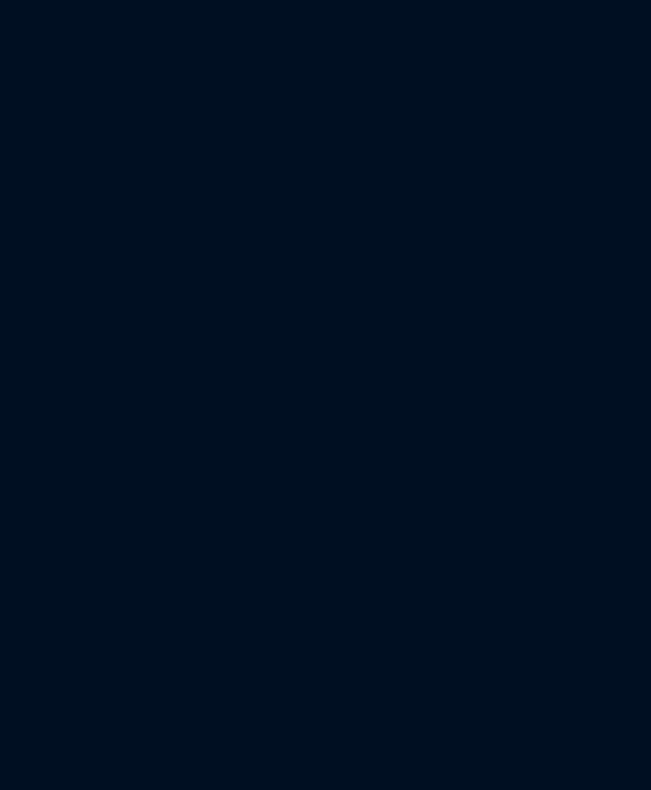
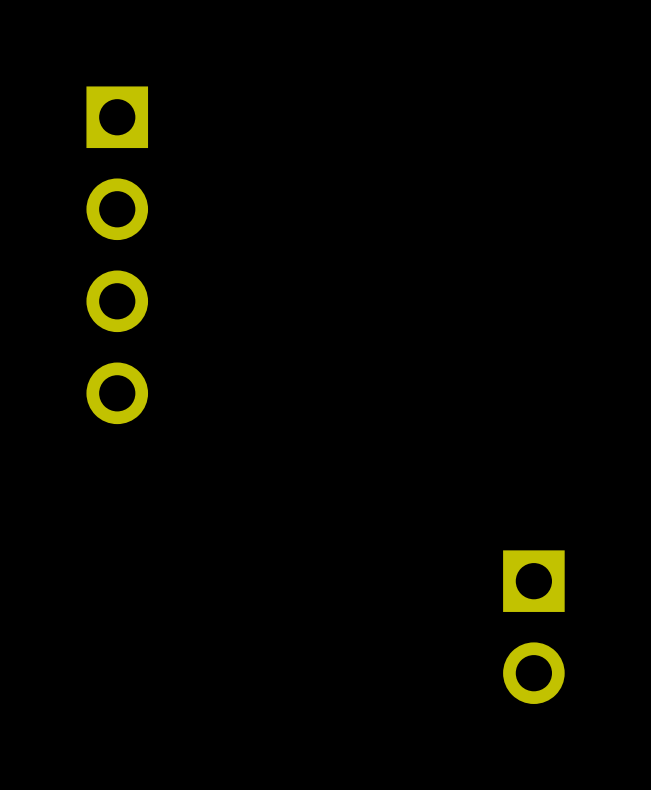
part: none -> (117, 255)
part: none -> (533, 627)

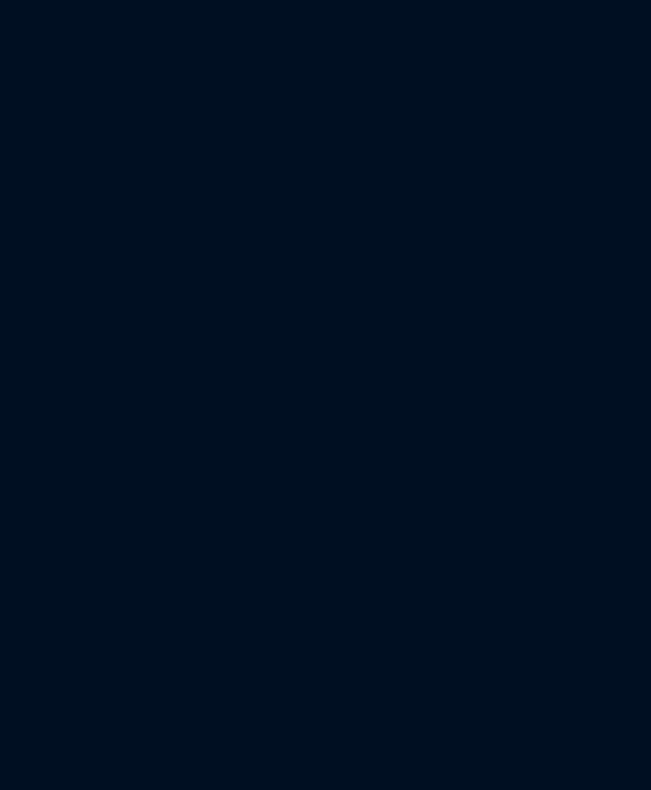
part: (117, 255) -> none
part: (533, 627) -> none

